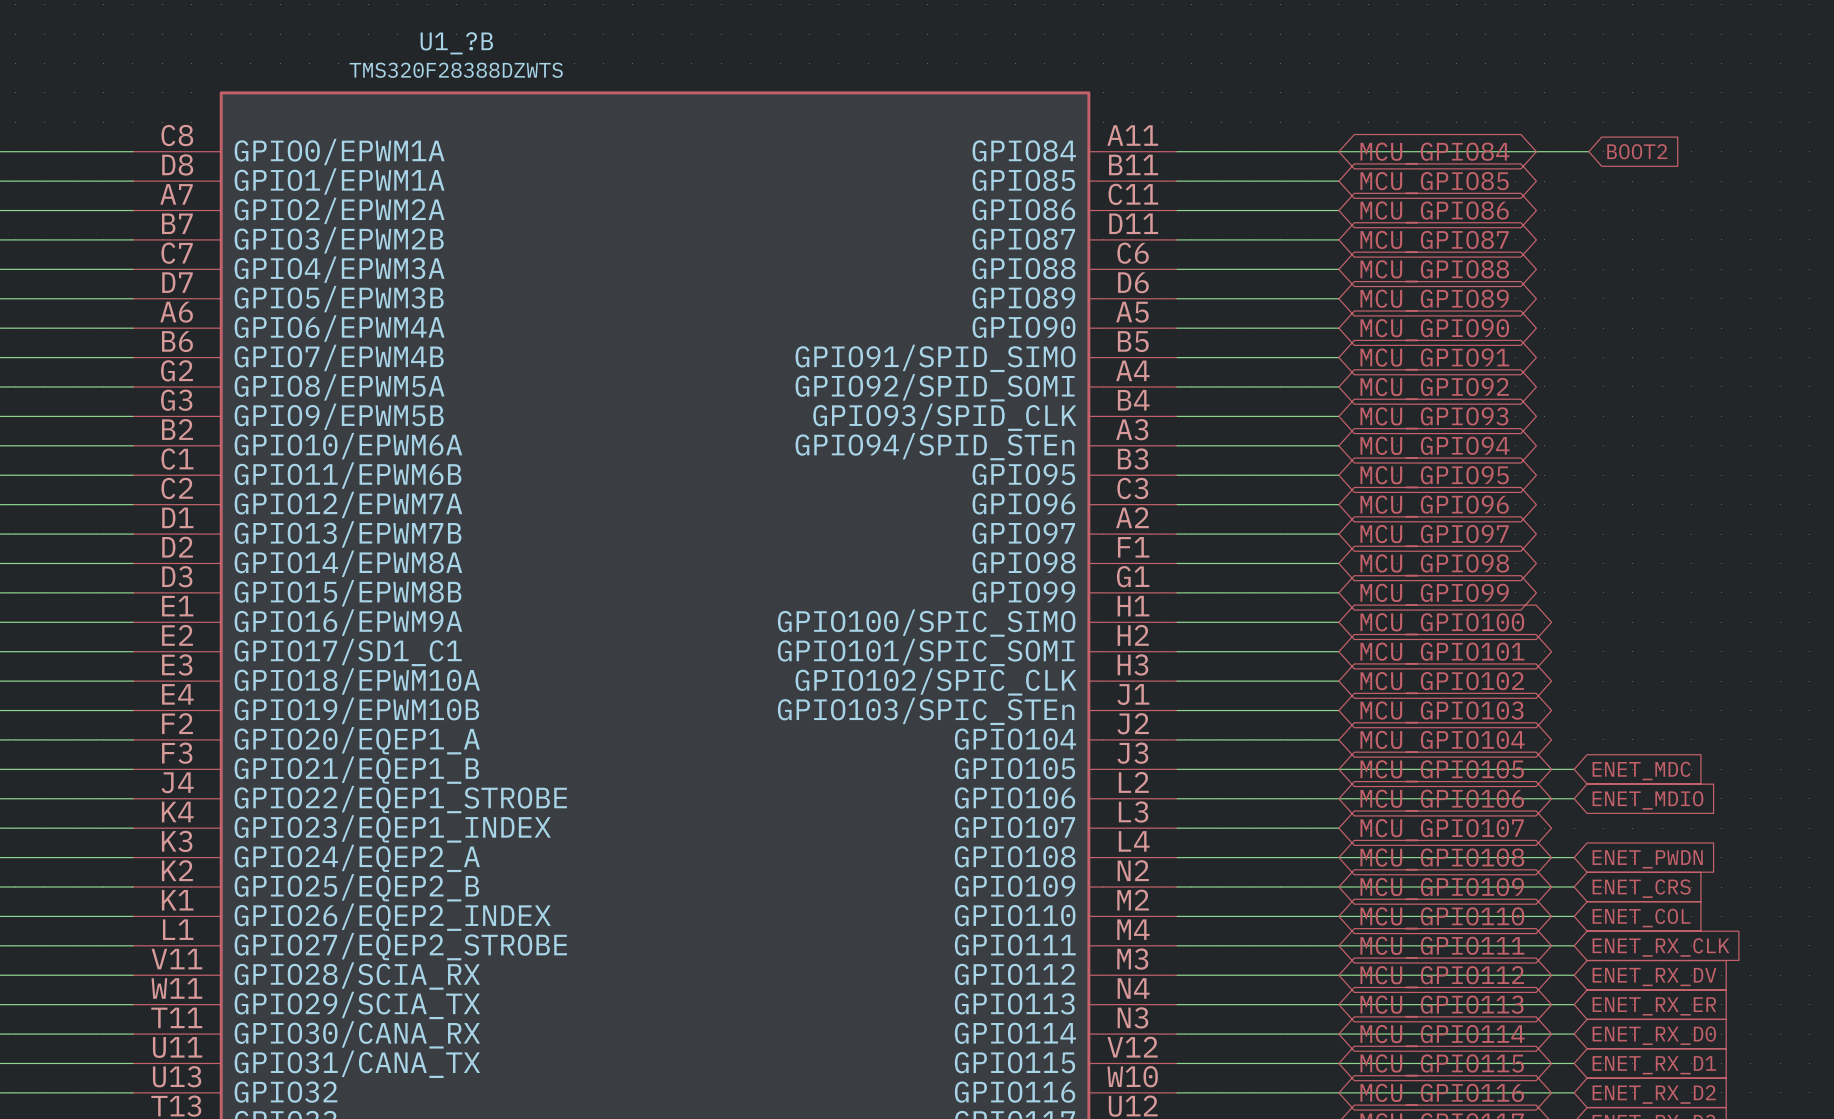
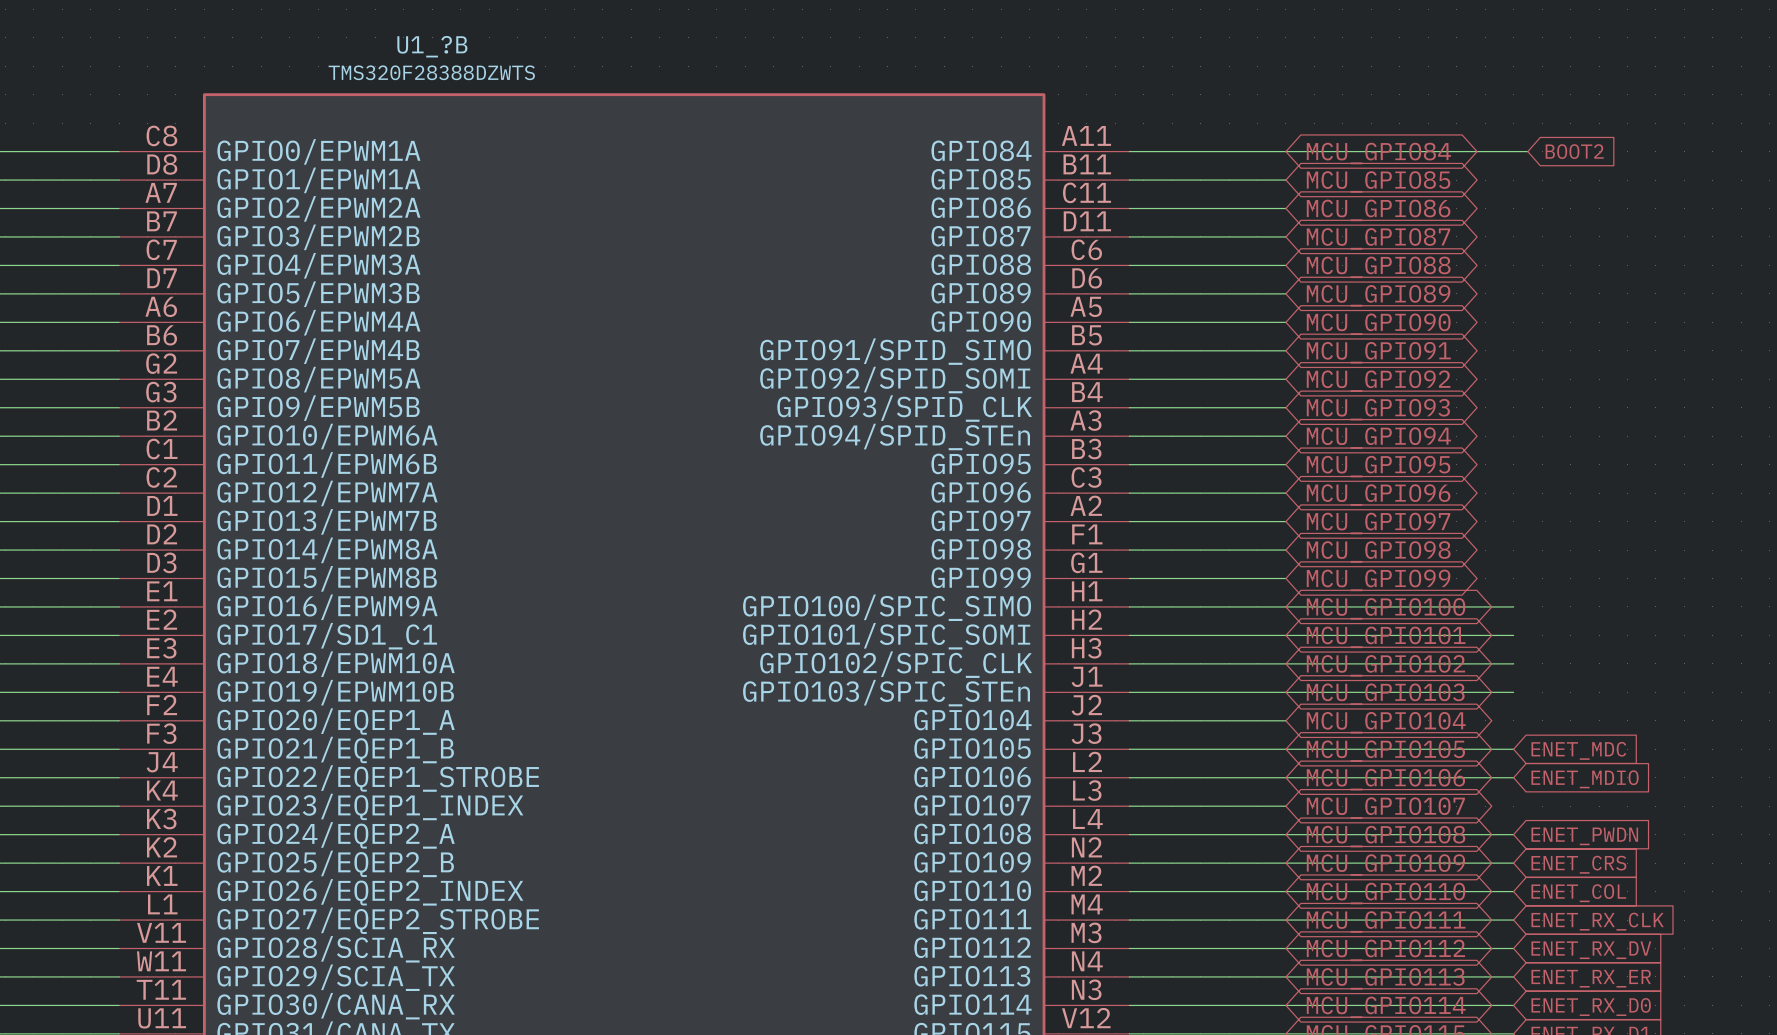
wire: none -> (1285, 606) (1513, 606)
wire: none -> (1285, 635) (1513, 635)
wire: none -> (1285, 663) (1513, 663)
wire: none -> (1285, 692) (1513, 692)

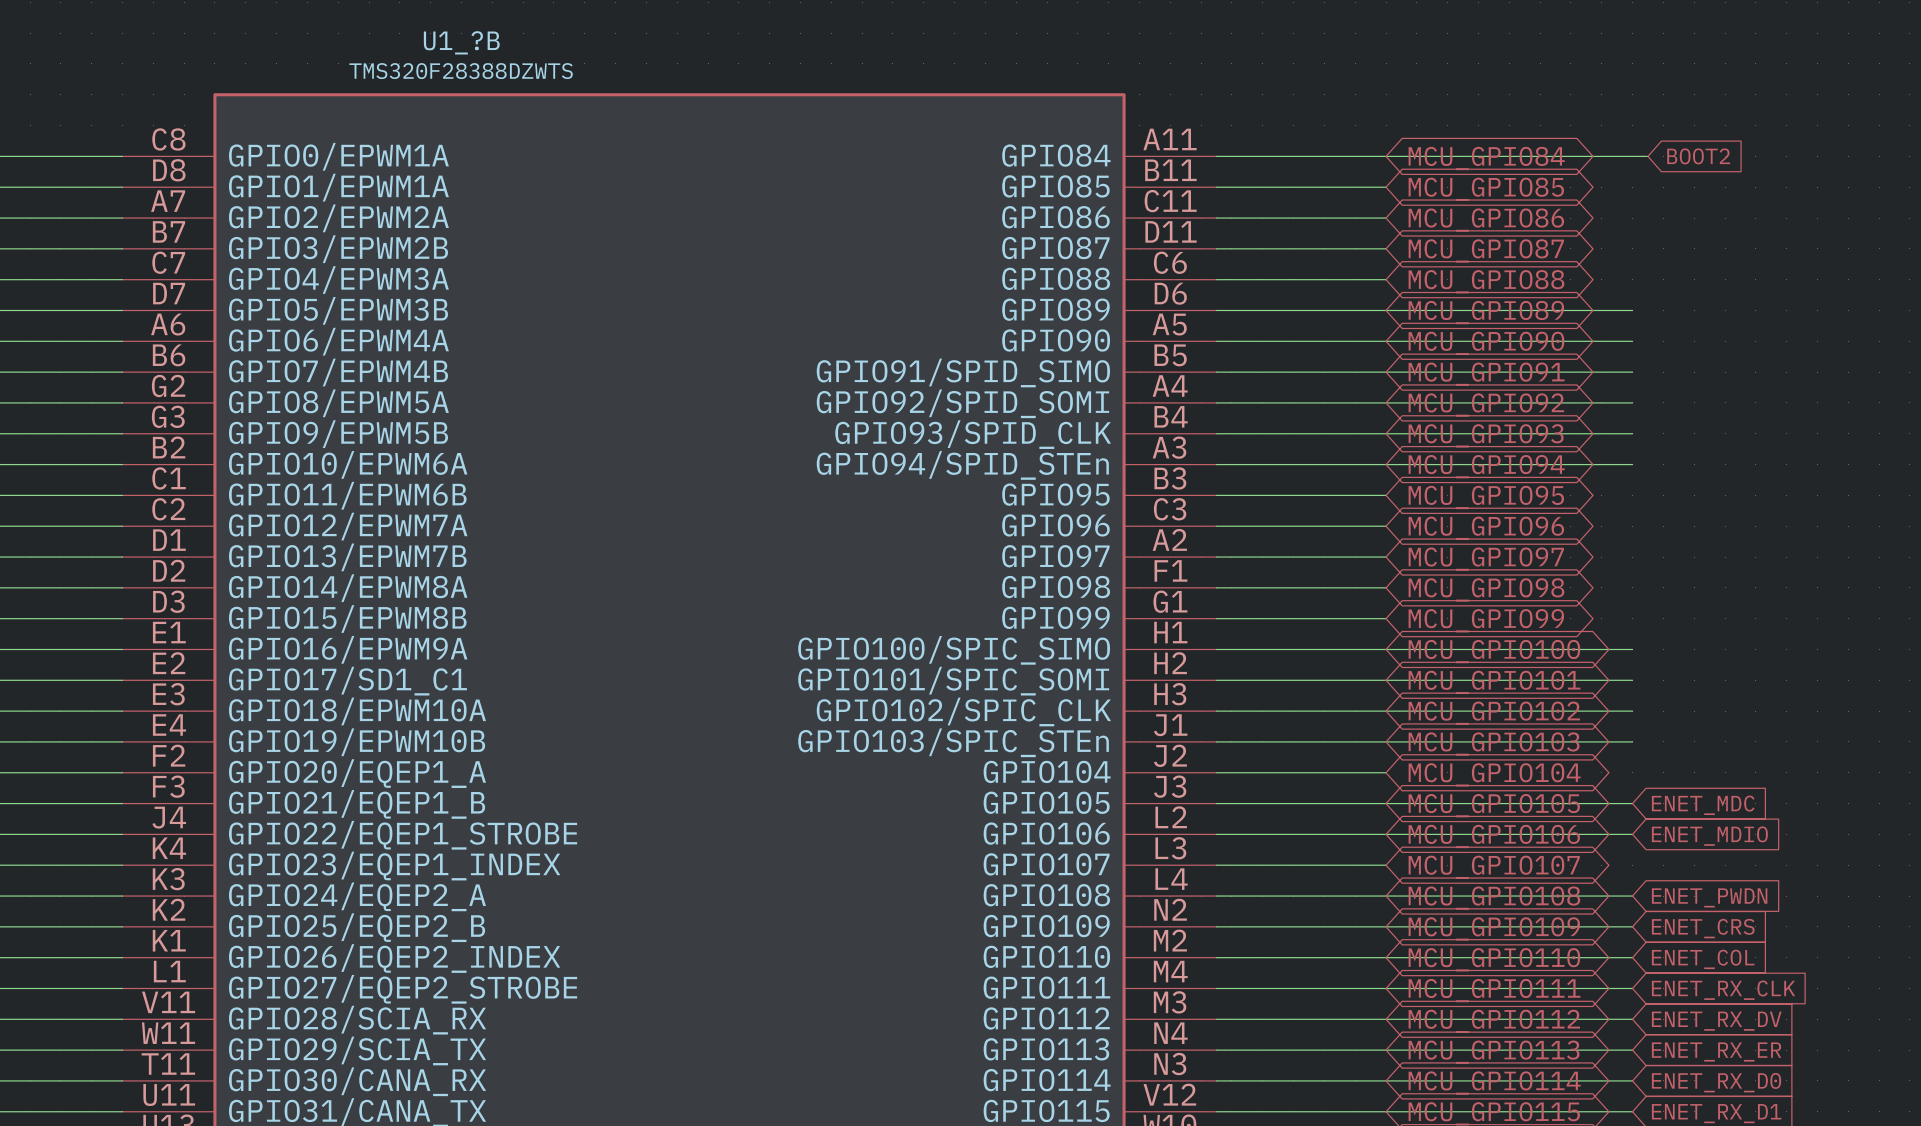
wire: none -> (1386, 310) (1632, 310)
wire: none -> (1386, 341) (1632, 341)
wire: none -> (1386, 372) (1632, 372)
wire: none -> (1386, 402) (1632, 402)
wire: none -> (1386, 433) (1632, 433)
wire: none -> (1386, 464) (1632, 464)

